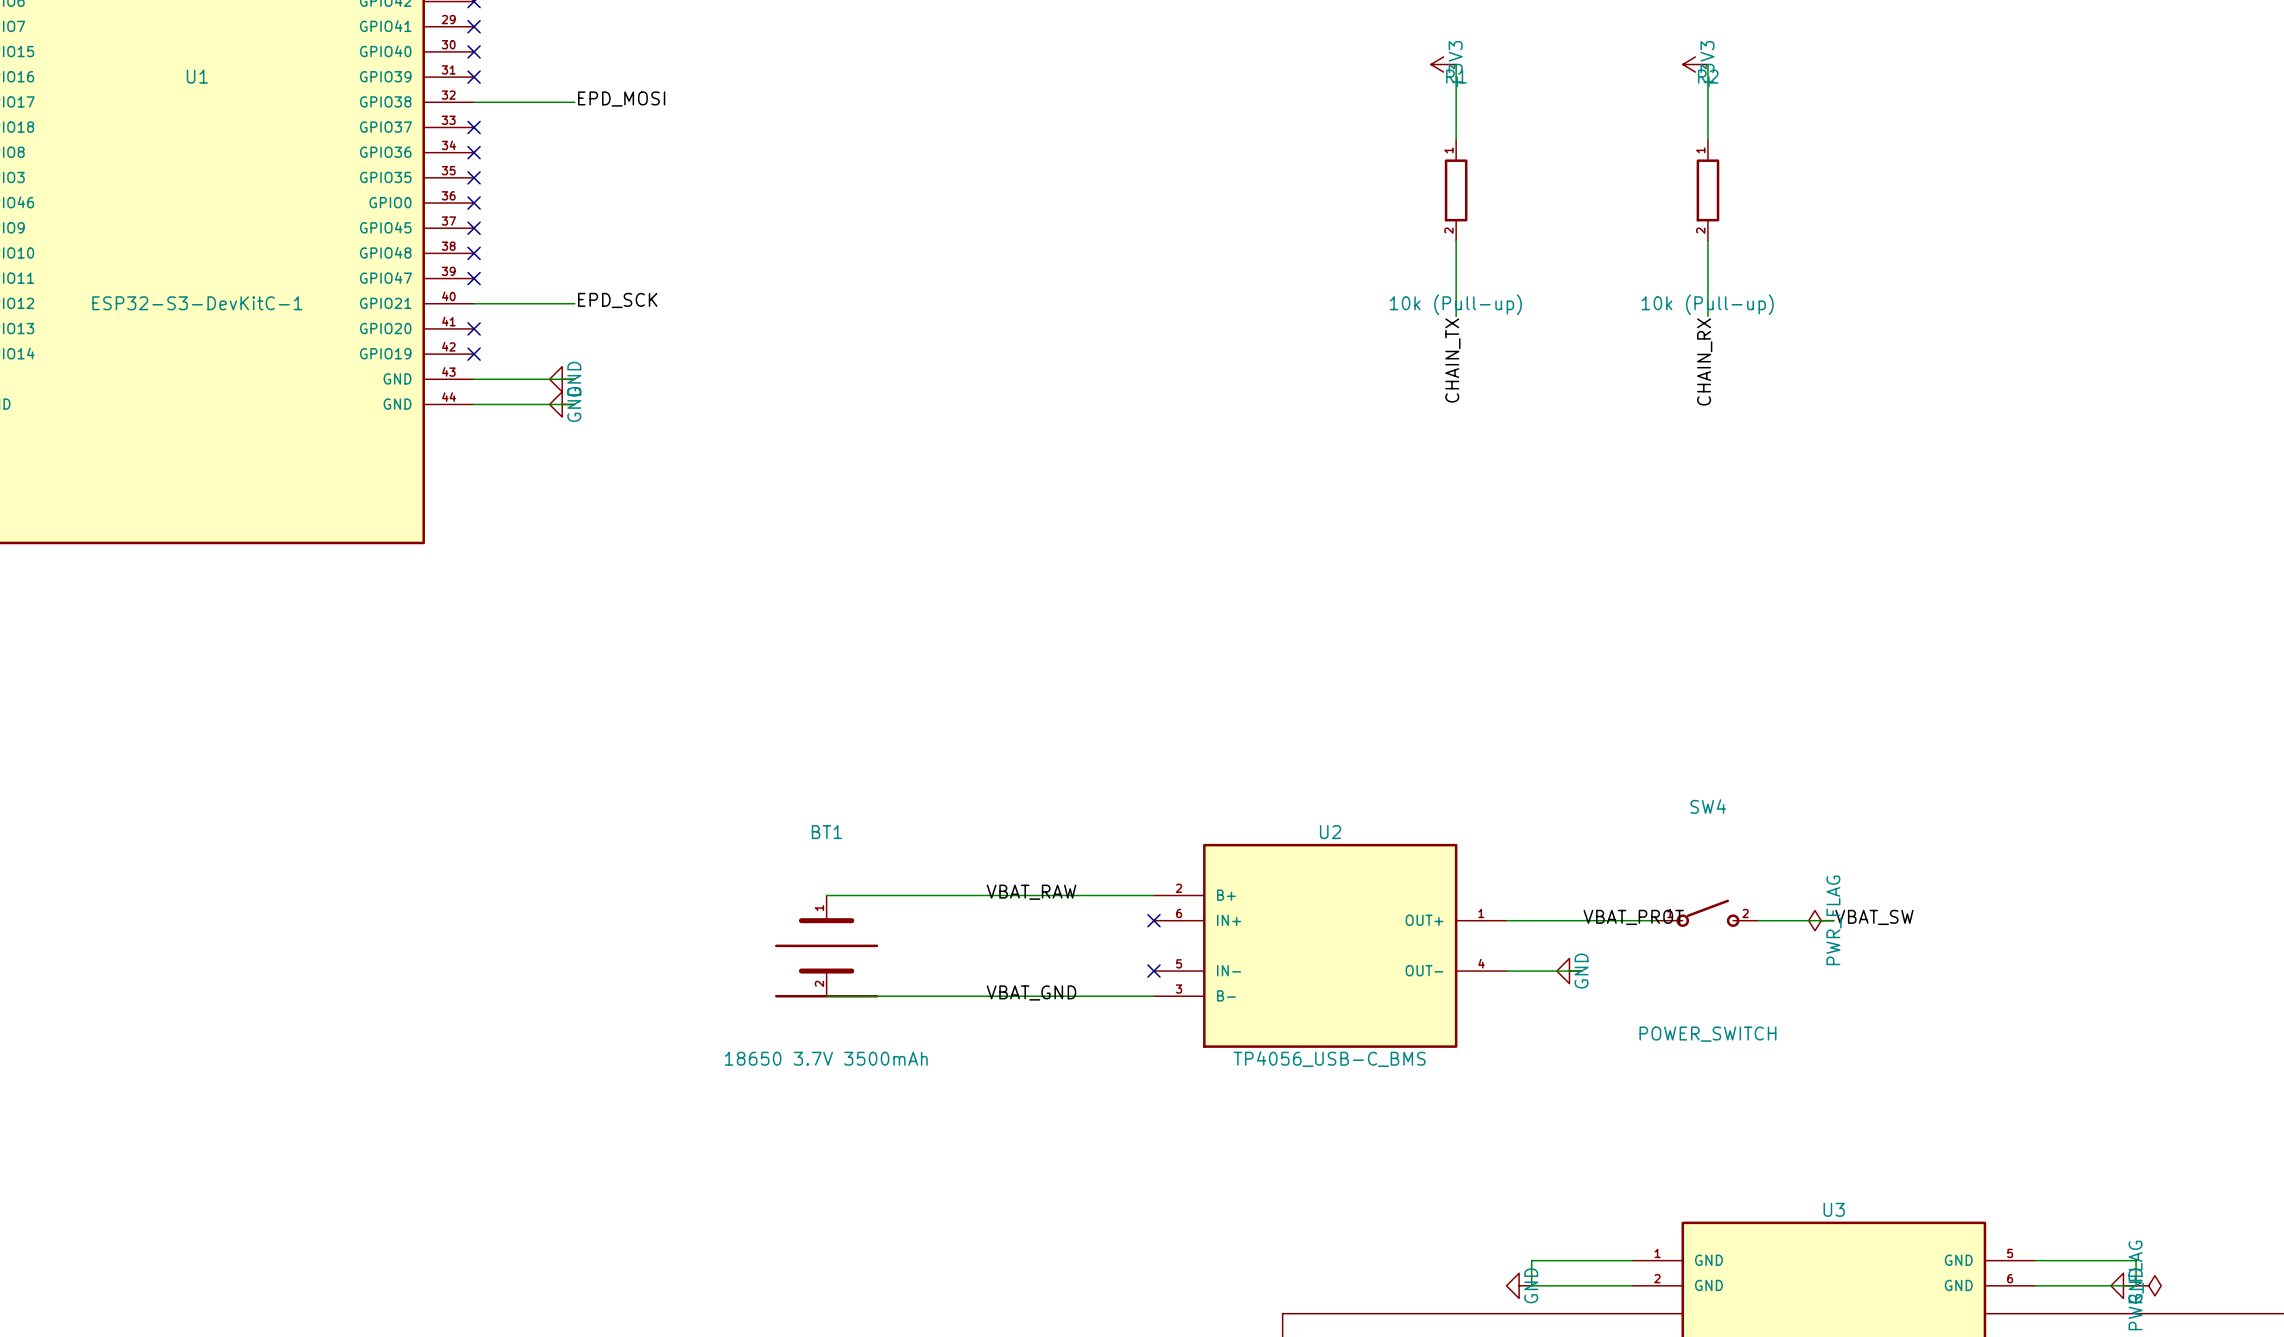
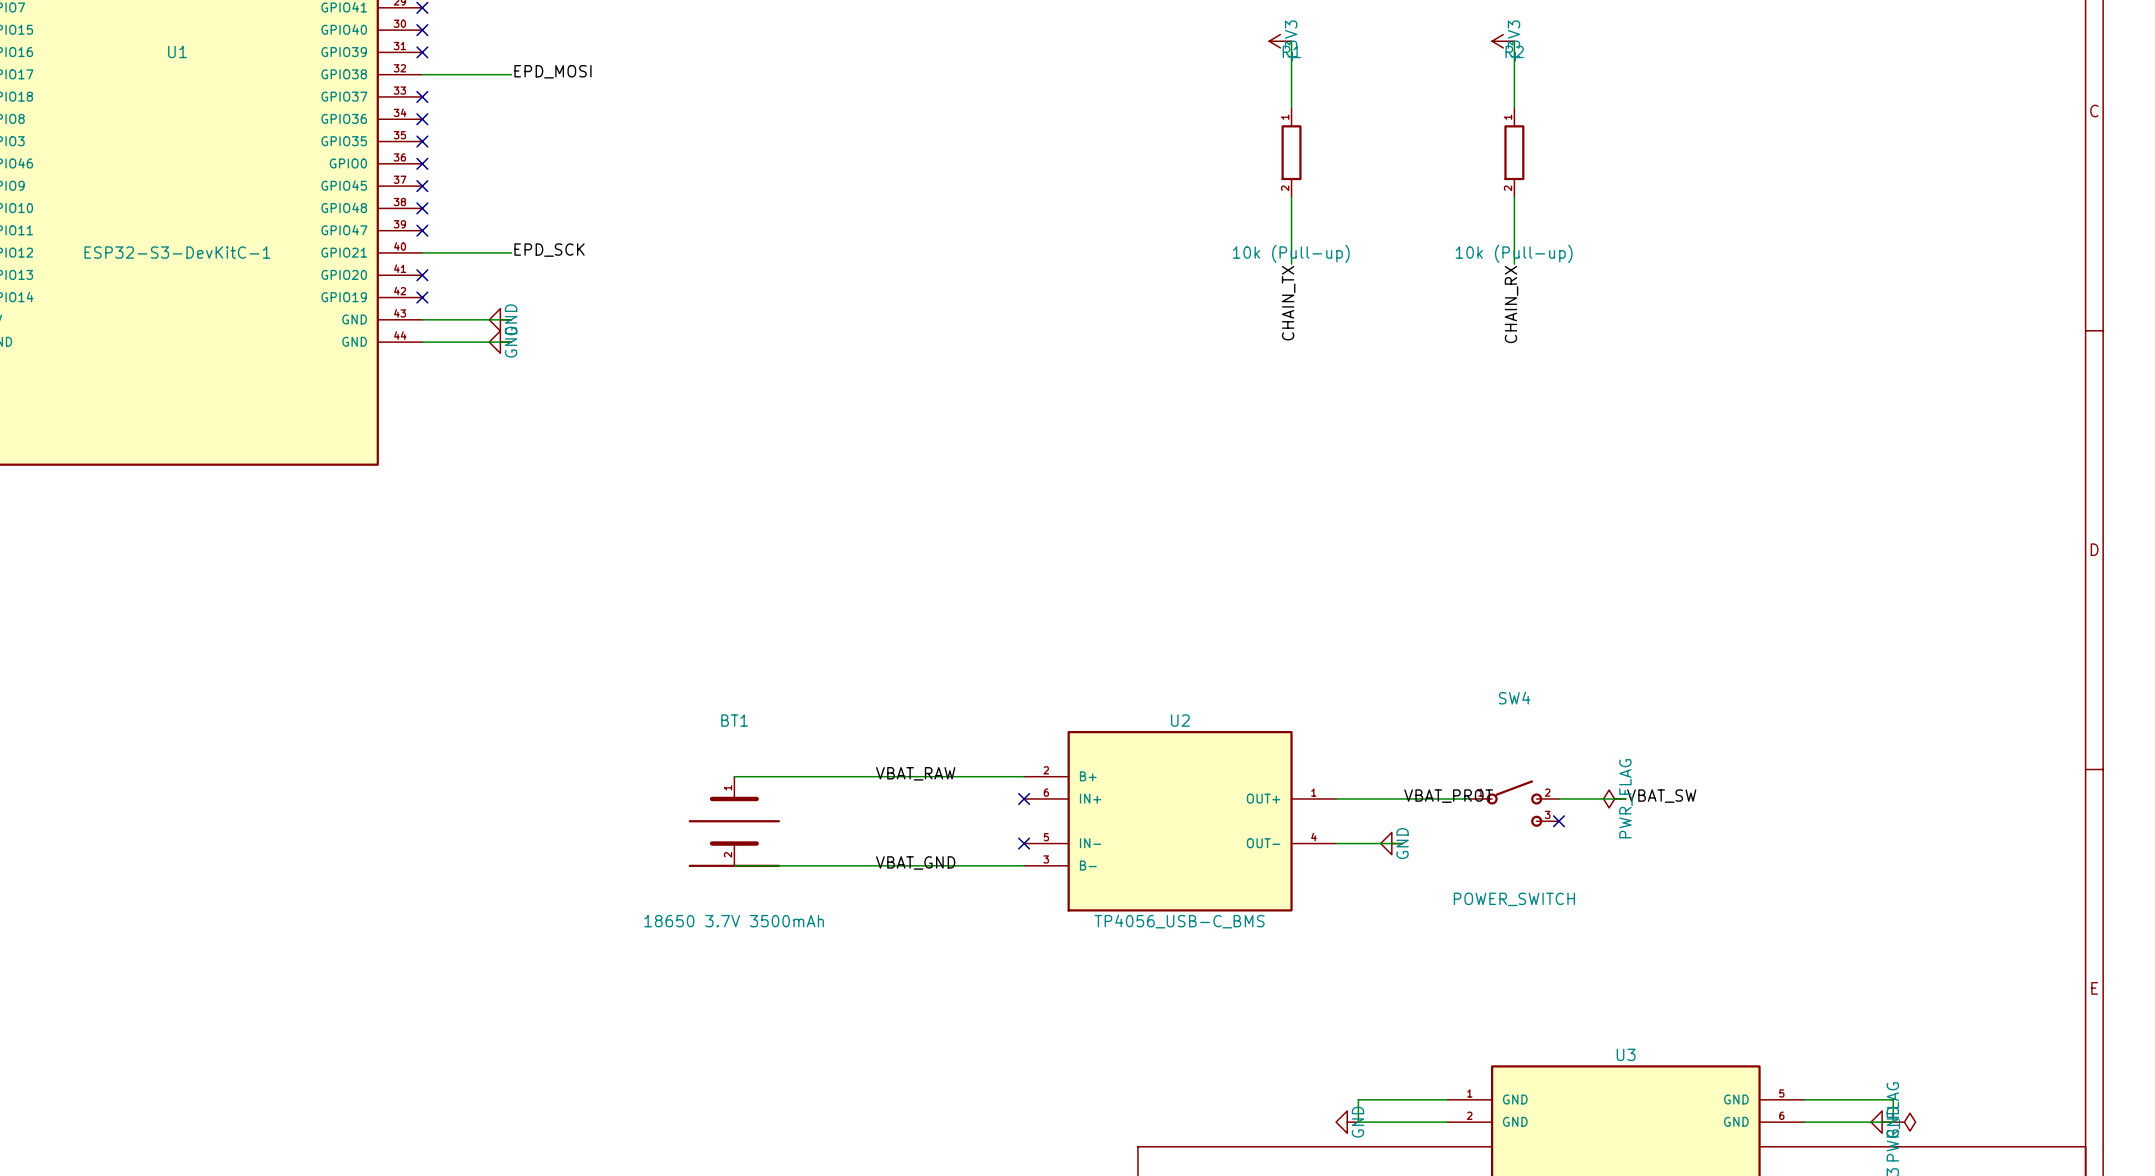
SW4 symbol: [1657, 899, 1759, 927] -> [1469, 780, 1559, 827]
no-connect mark: none -> (1558, 821)

